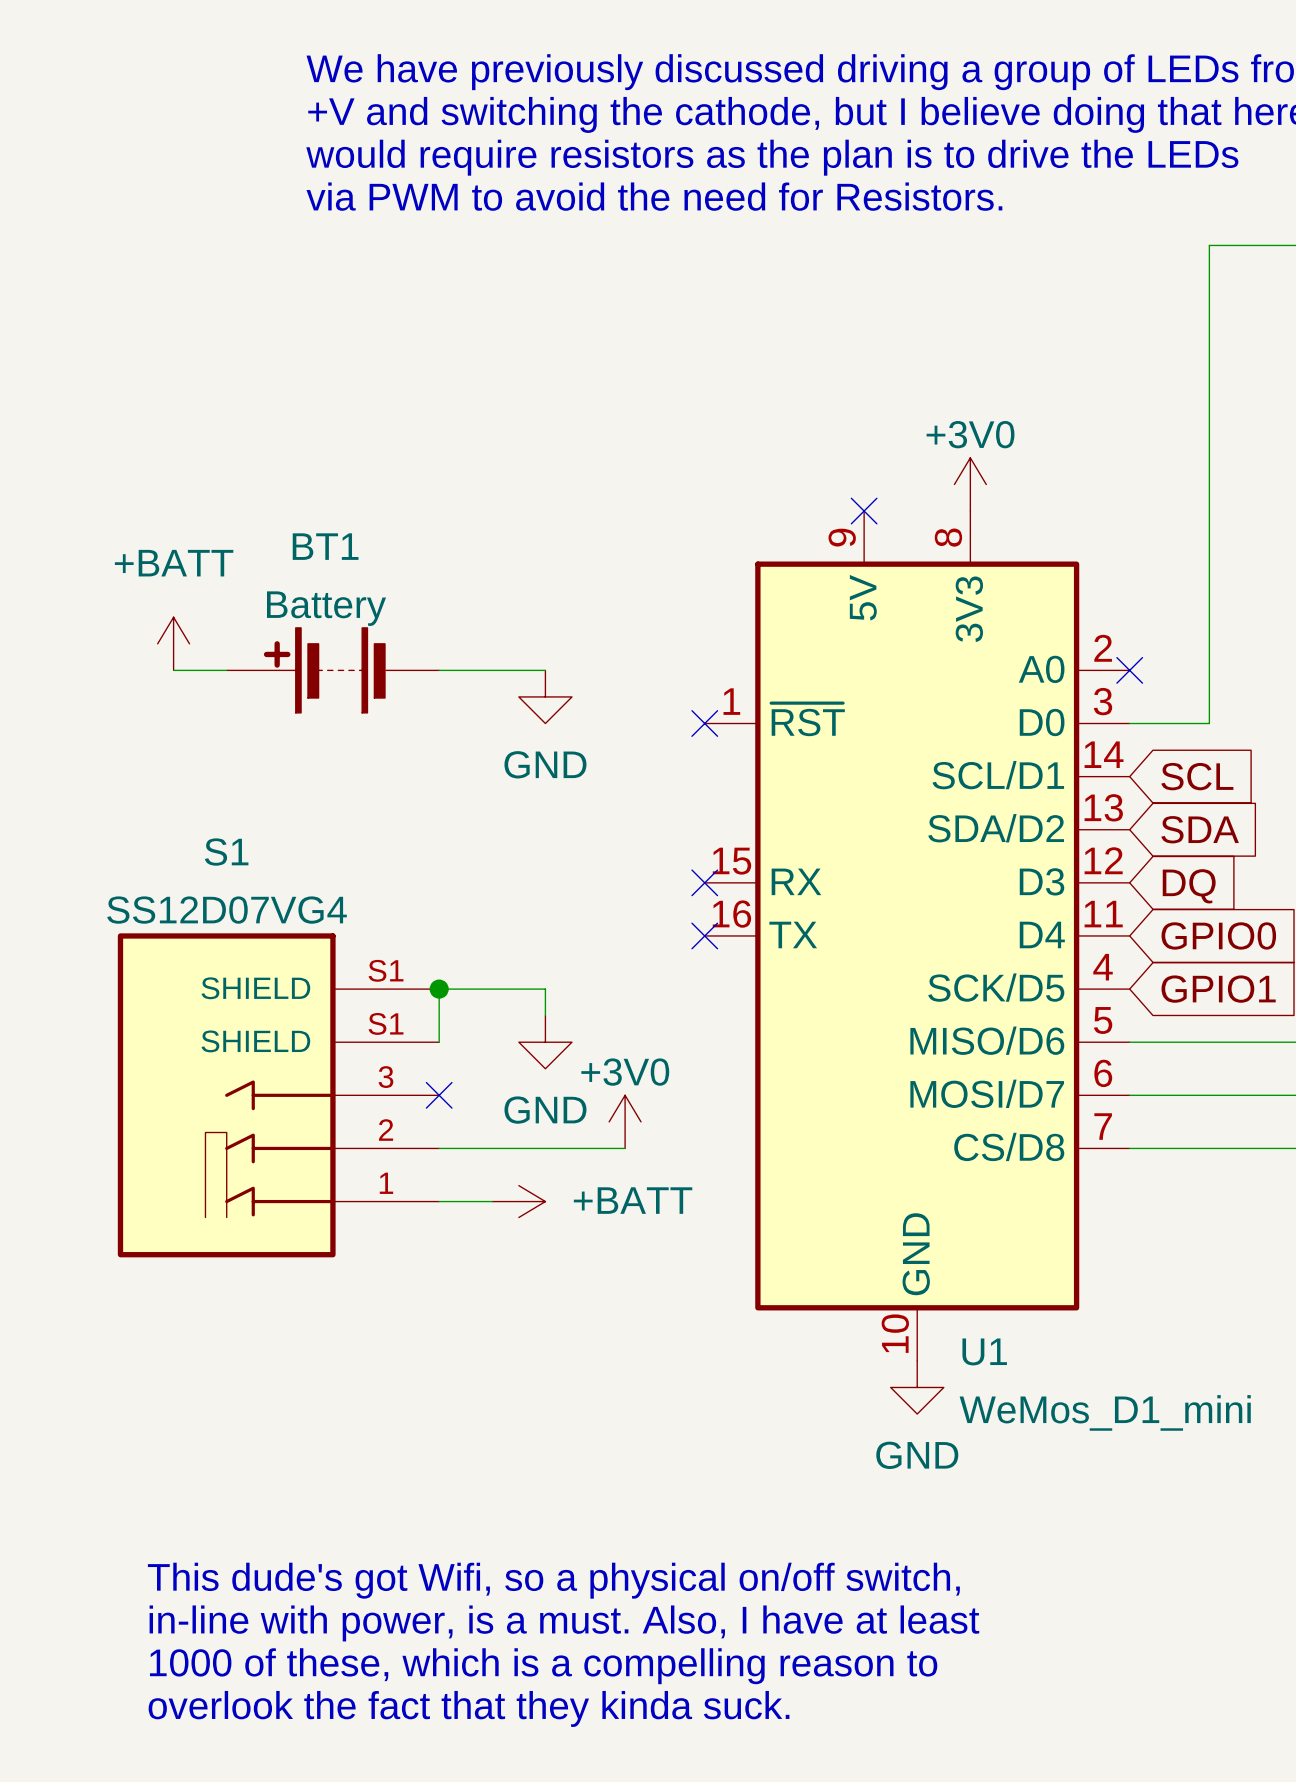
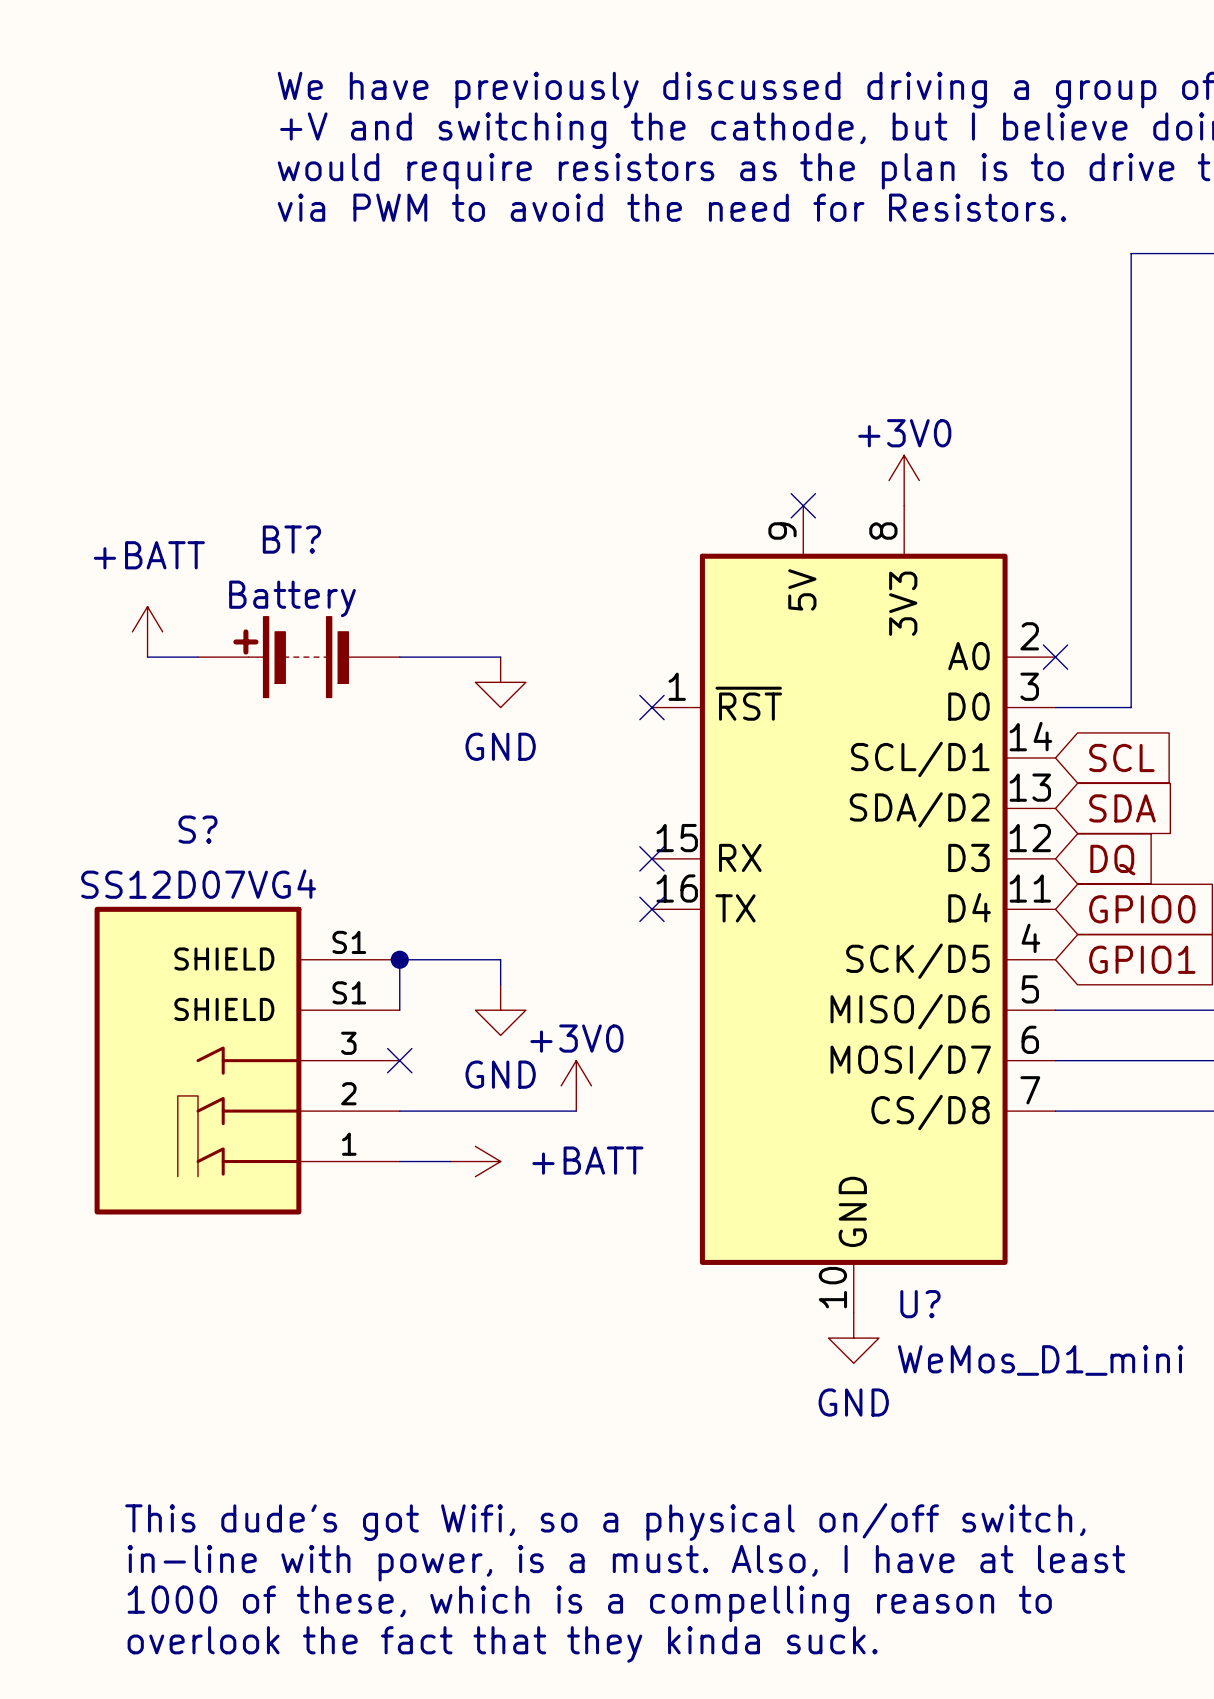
BT1 name: BT1 (325, 546) -> BT? (291, 539)
S1 name: S1 (226, 852) -> S? (197, 829)
U1 name: U1 (984, 1351) -> U? (920, 1304)

